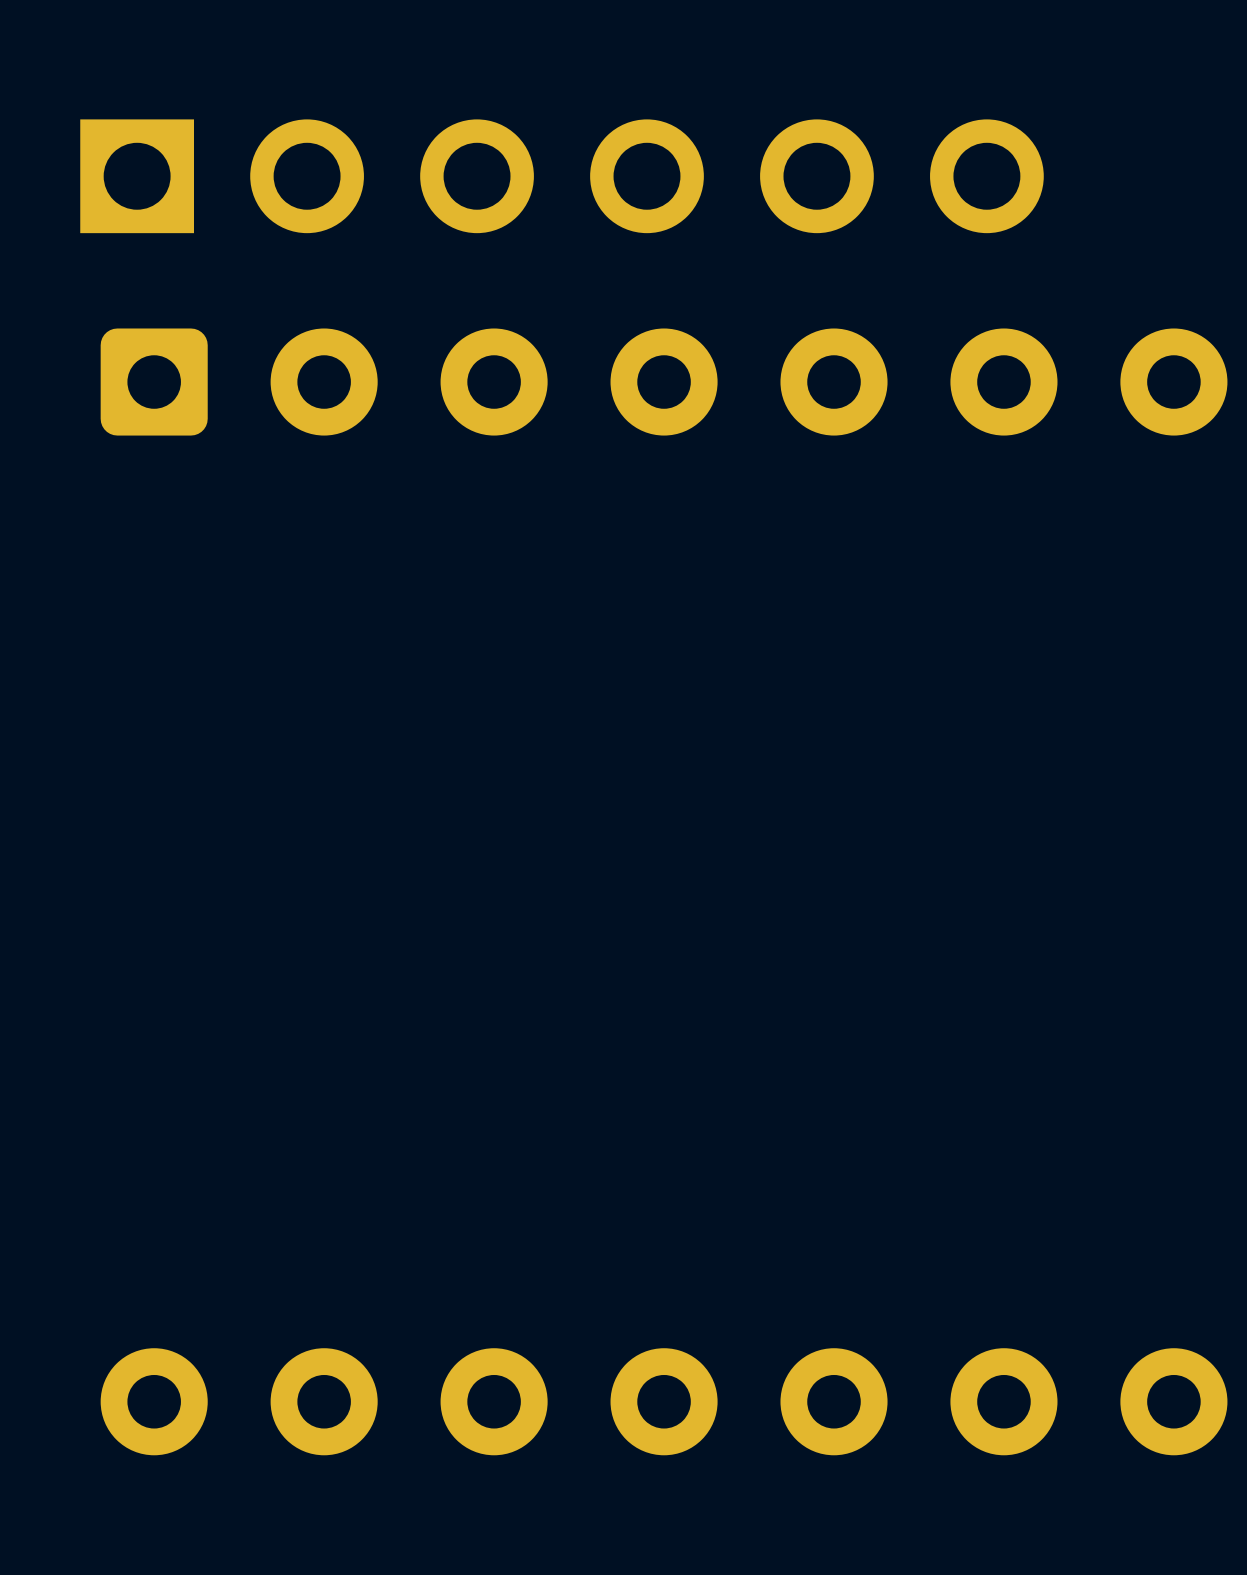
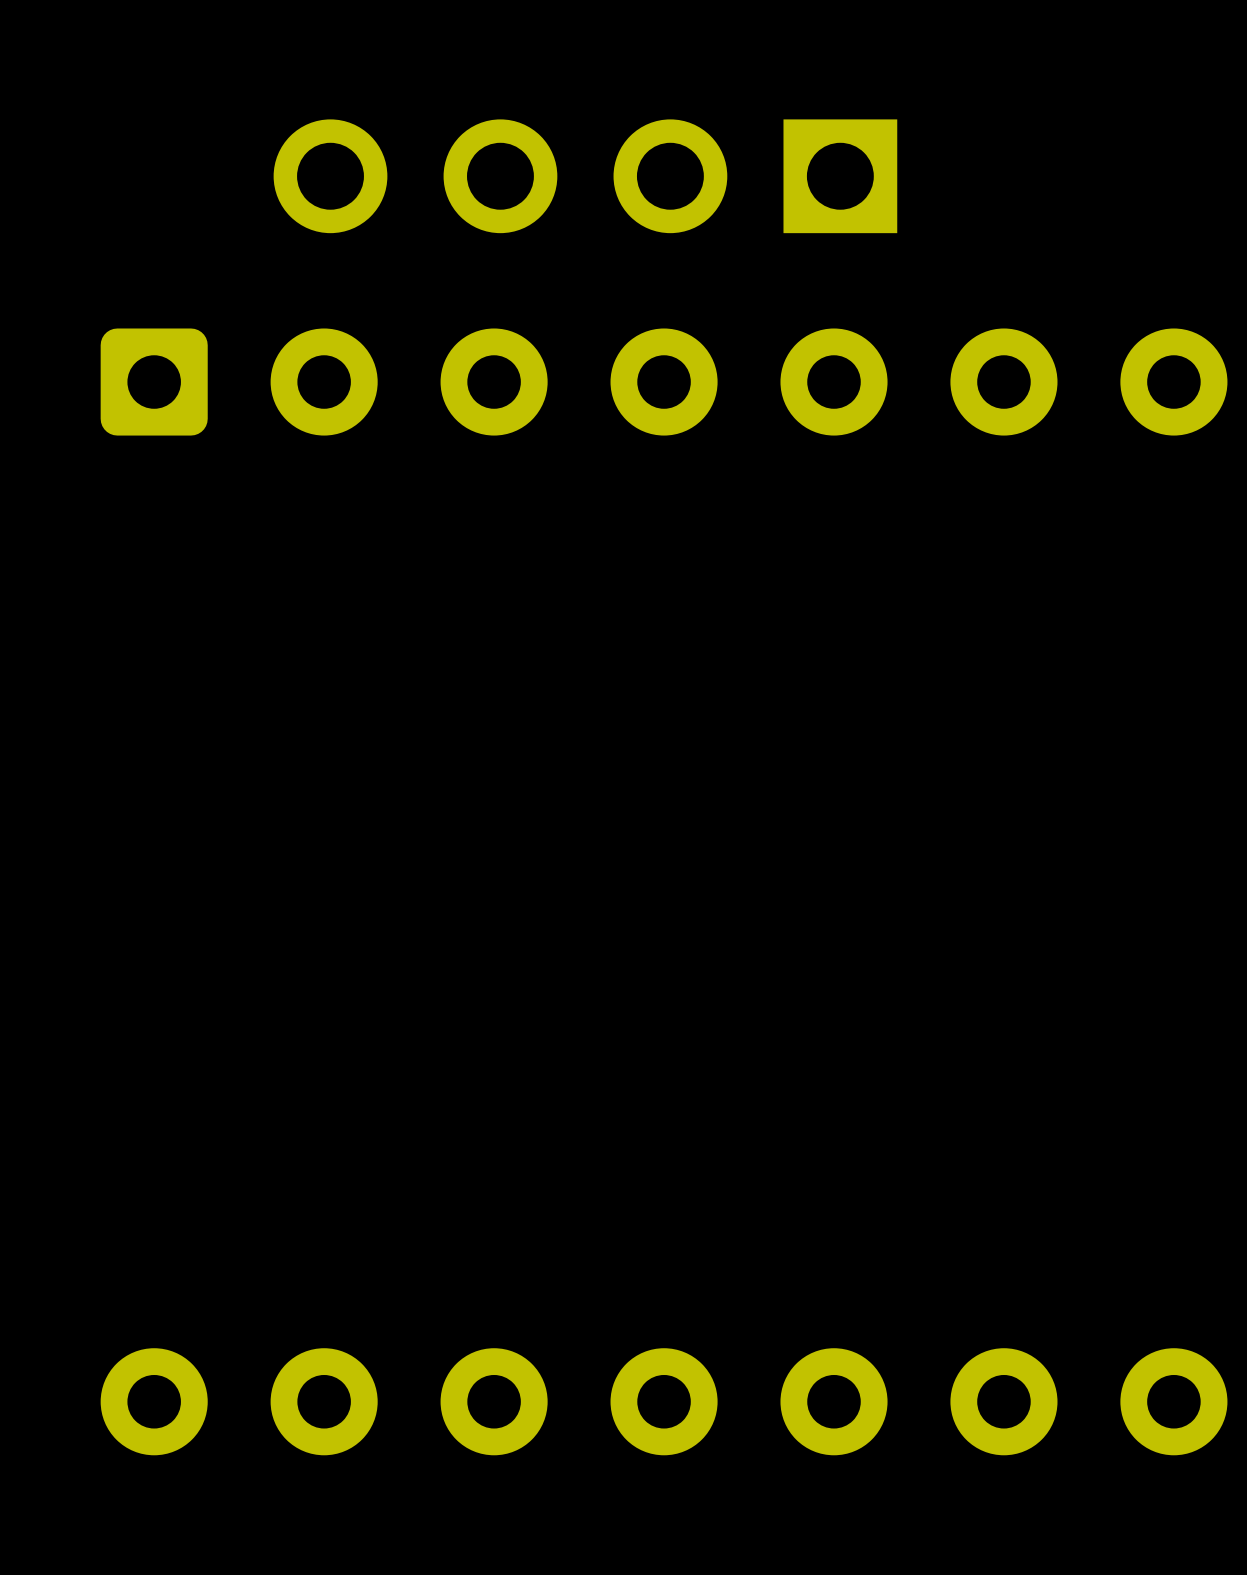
part footprint: [80, 119, 1044, 234] -> [273, 119, 898, 234]

